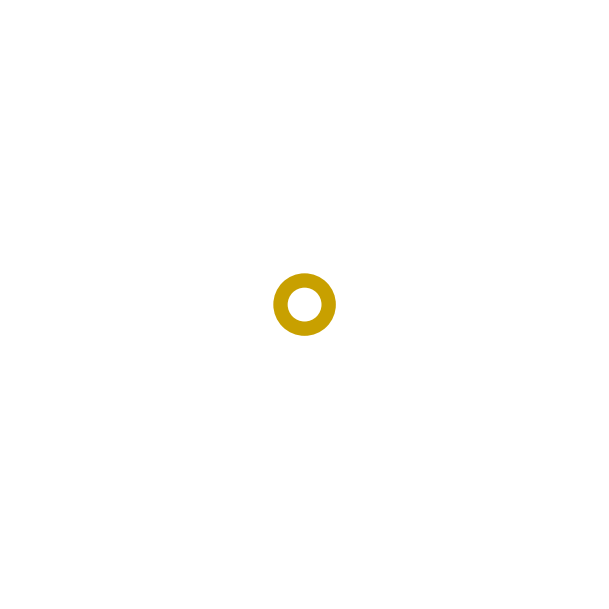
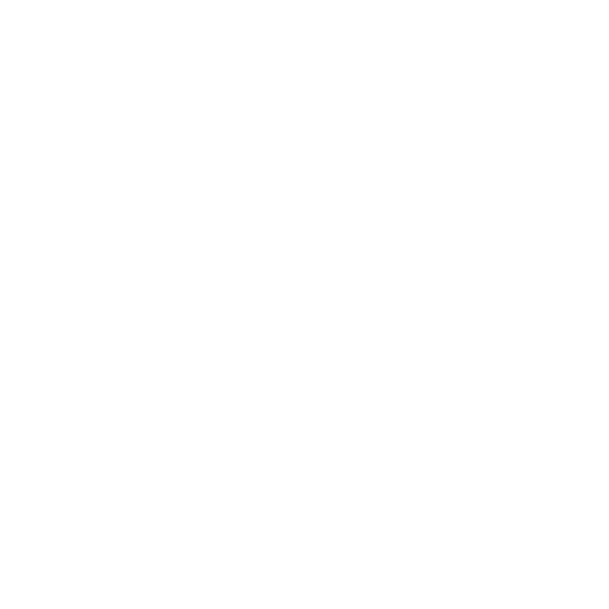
part: (304, 304) -> none

